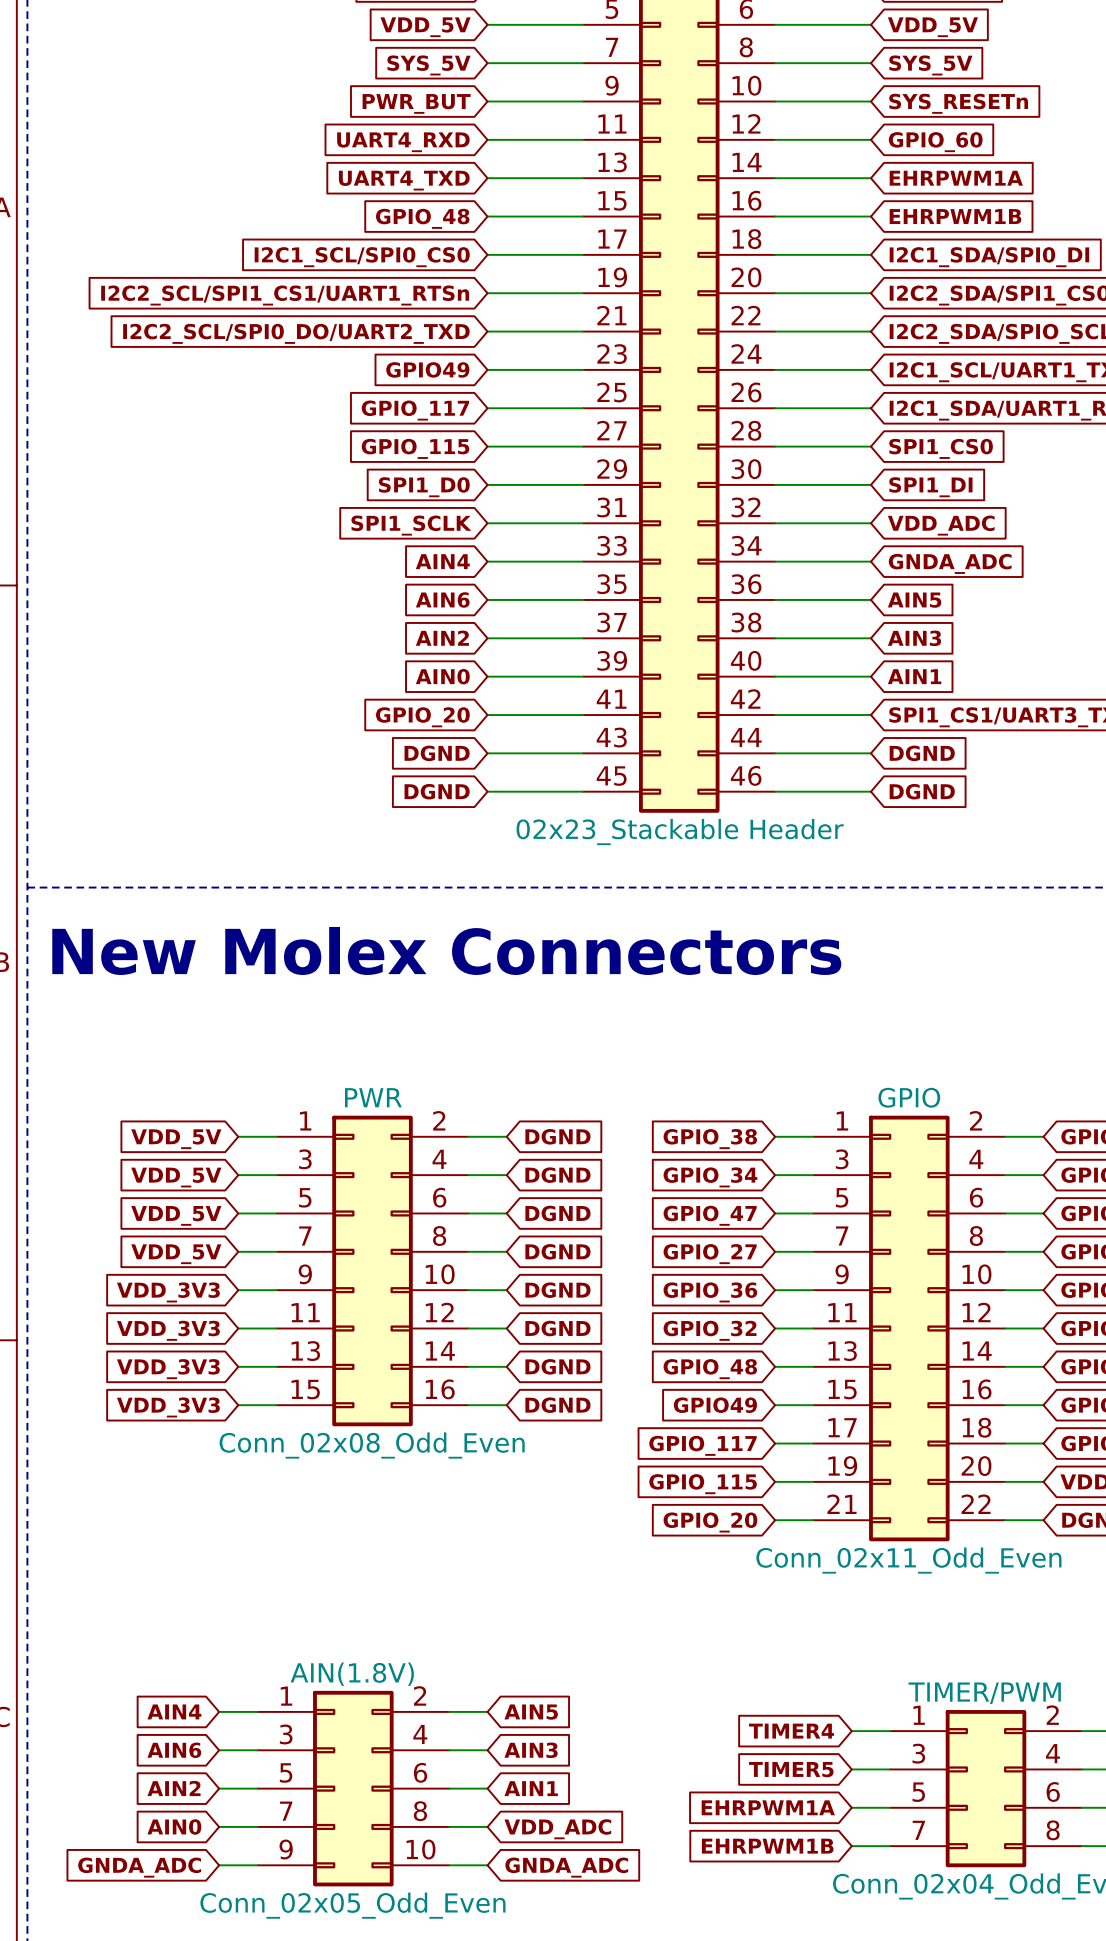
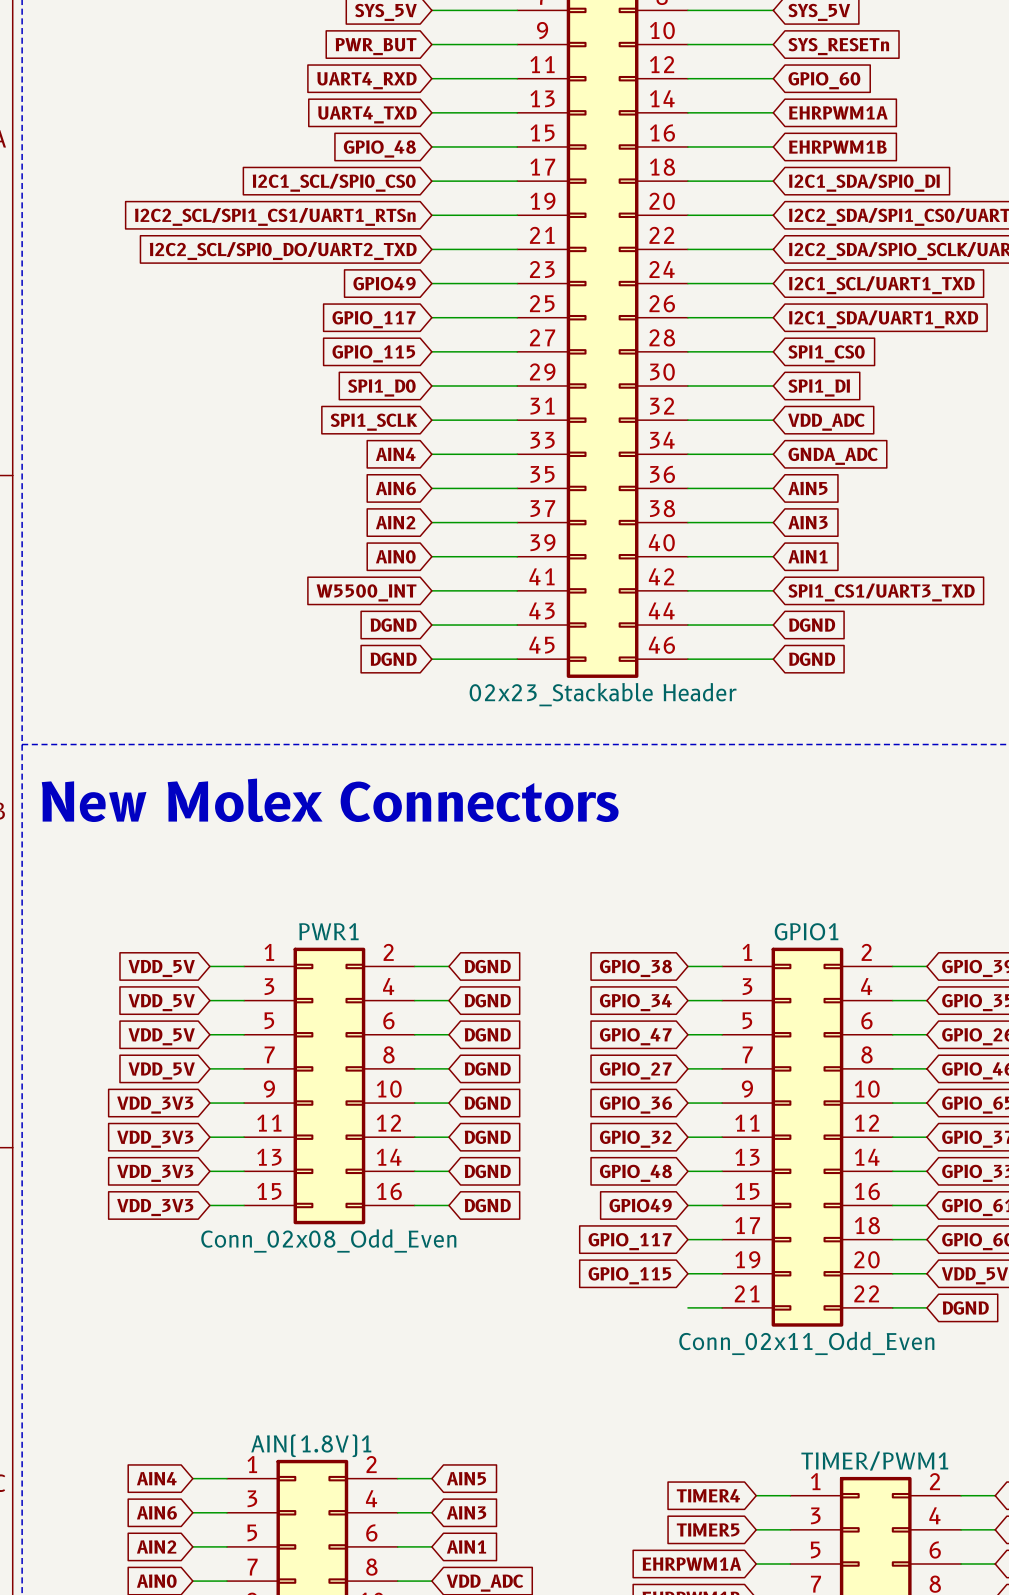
global label: GPIO_20 (422, 717) -> W5500_INT (366, 592)
PWR name: PWR (373, 1097) -> PWR1 (328, 931)
GPIO name: GPIO (909, 1097) -> GPIO1 (806, 931)
global label: GPIO_20 (710, 1522) -> none
AIN(1.8V) name: AIN(1.8V) (352, 1674) -> AIN(1.8V)1 (311, 1445)
TIMER/PWM name: TIMER/PWM (984, 1693) -> TIMER/PWM1 (874, 1461)

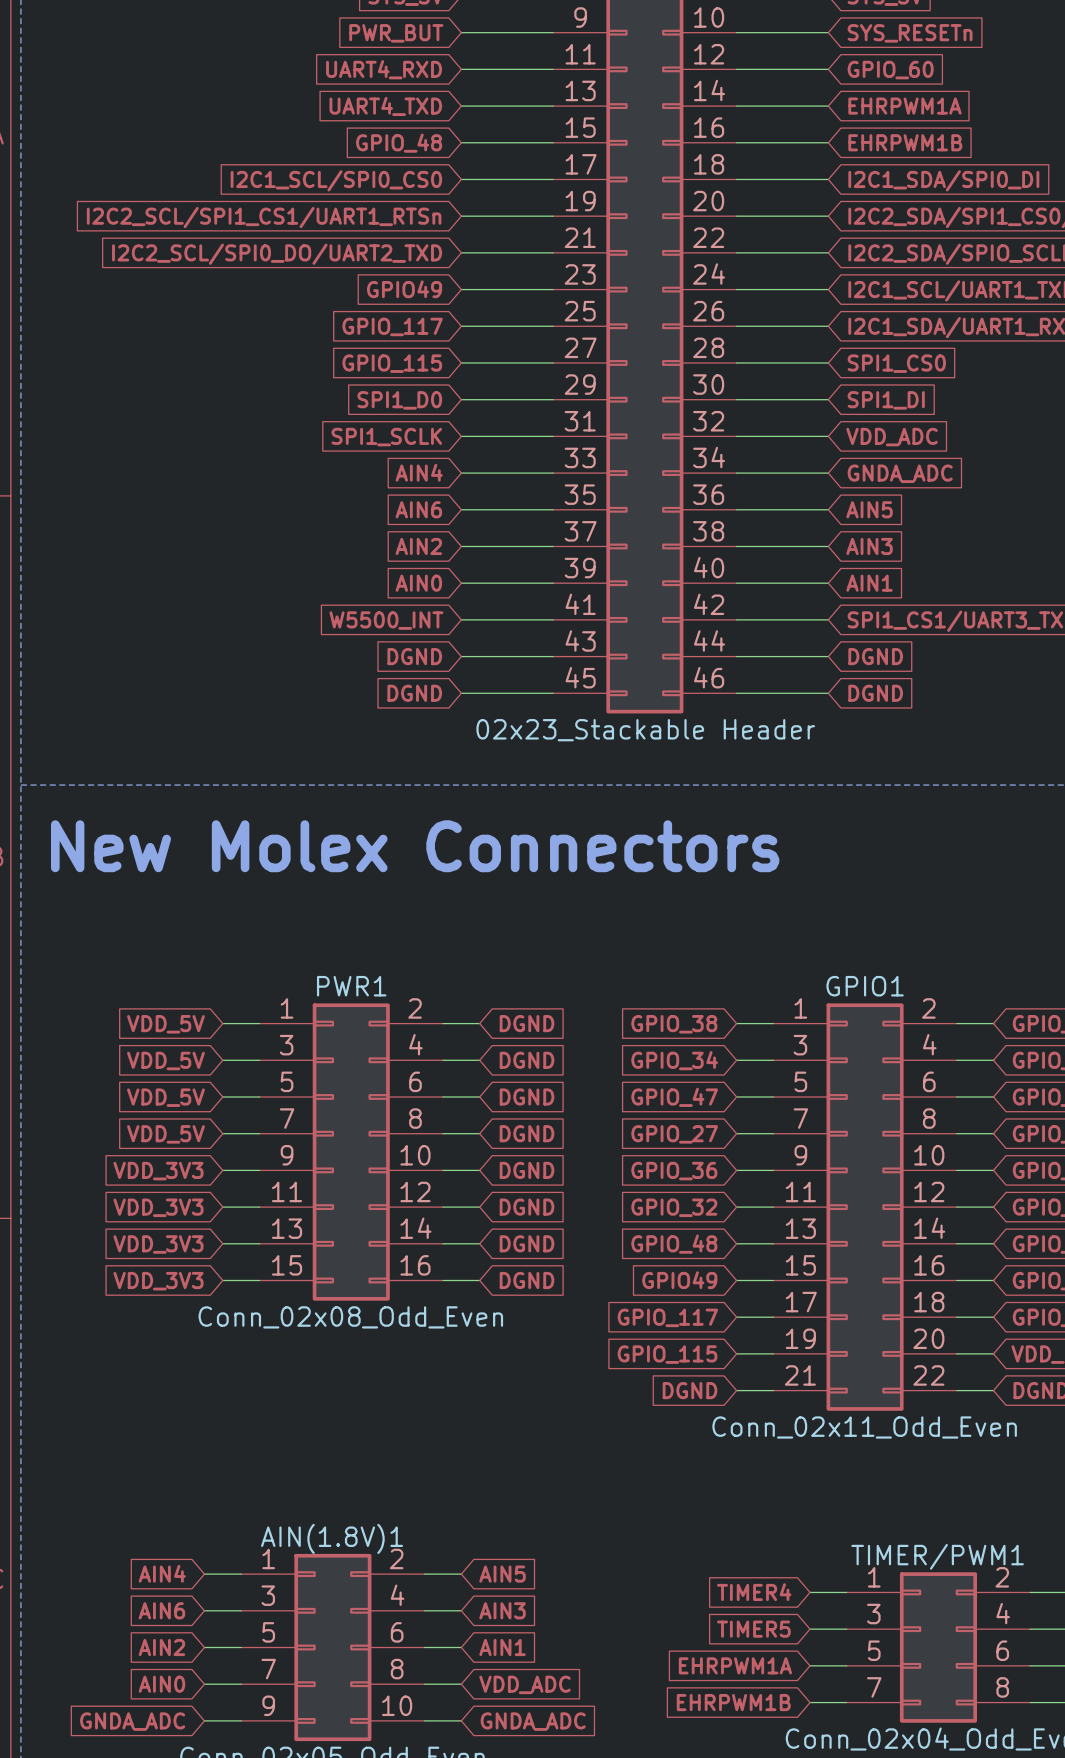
global label: none -> DGND (690, 1390)

